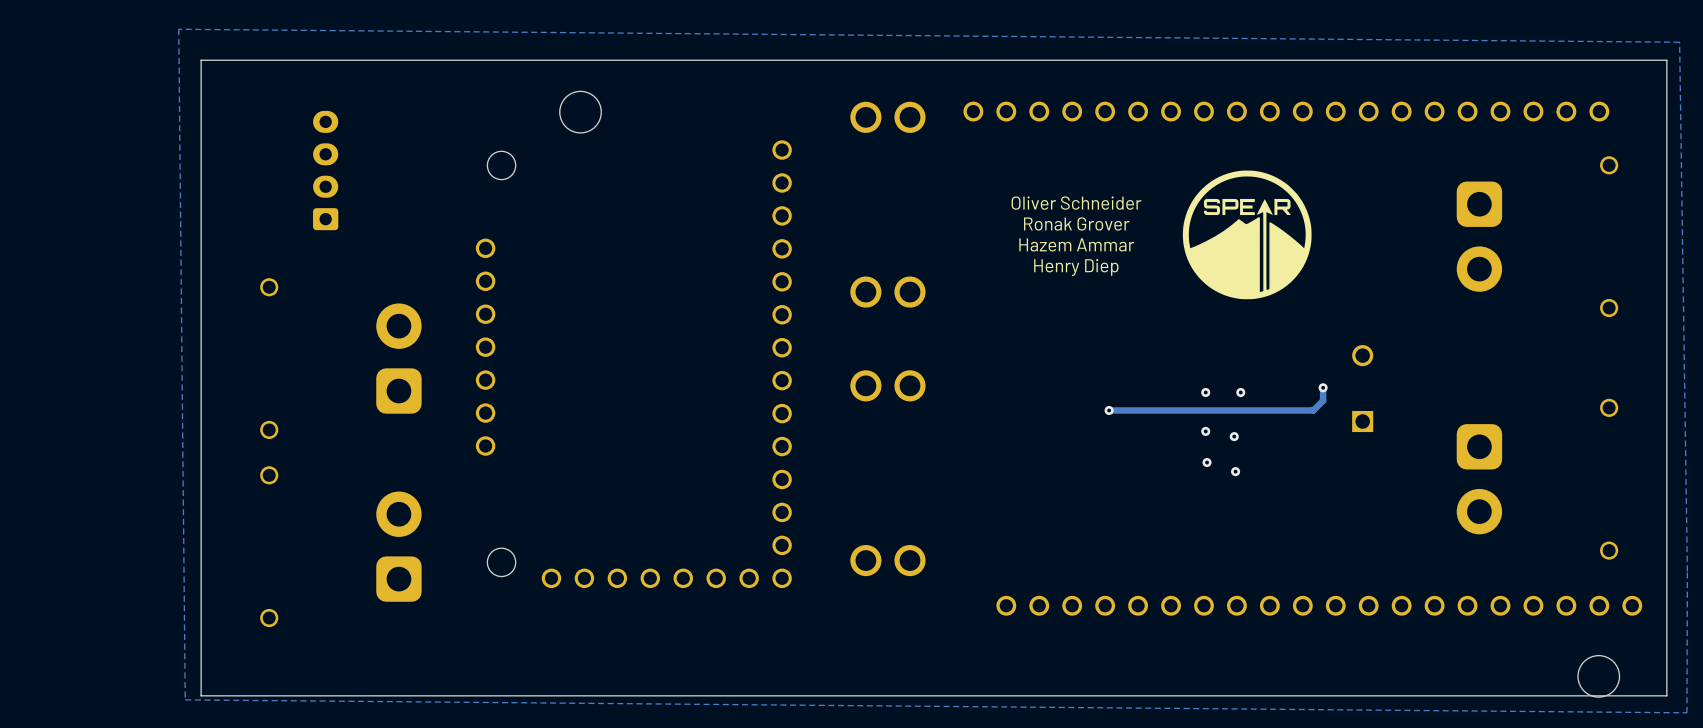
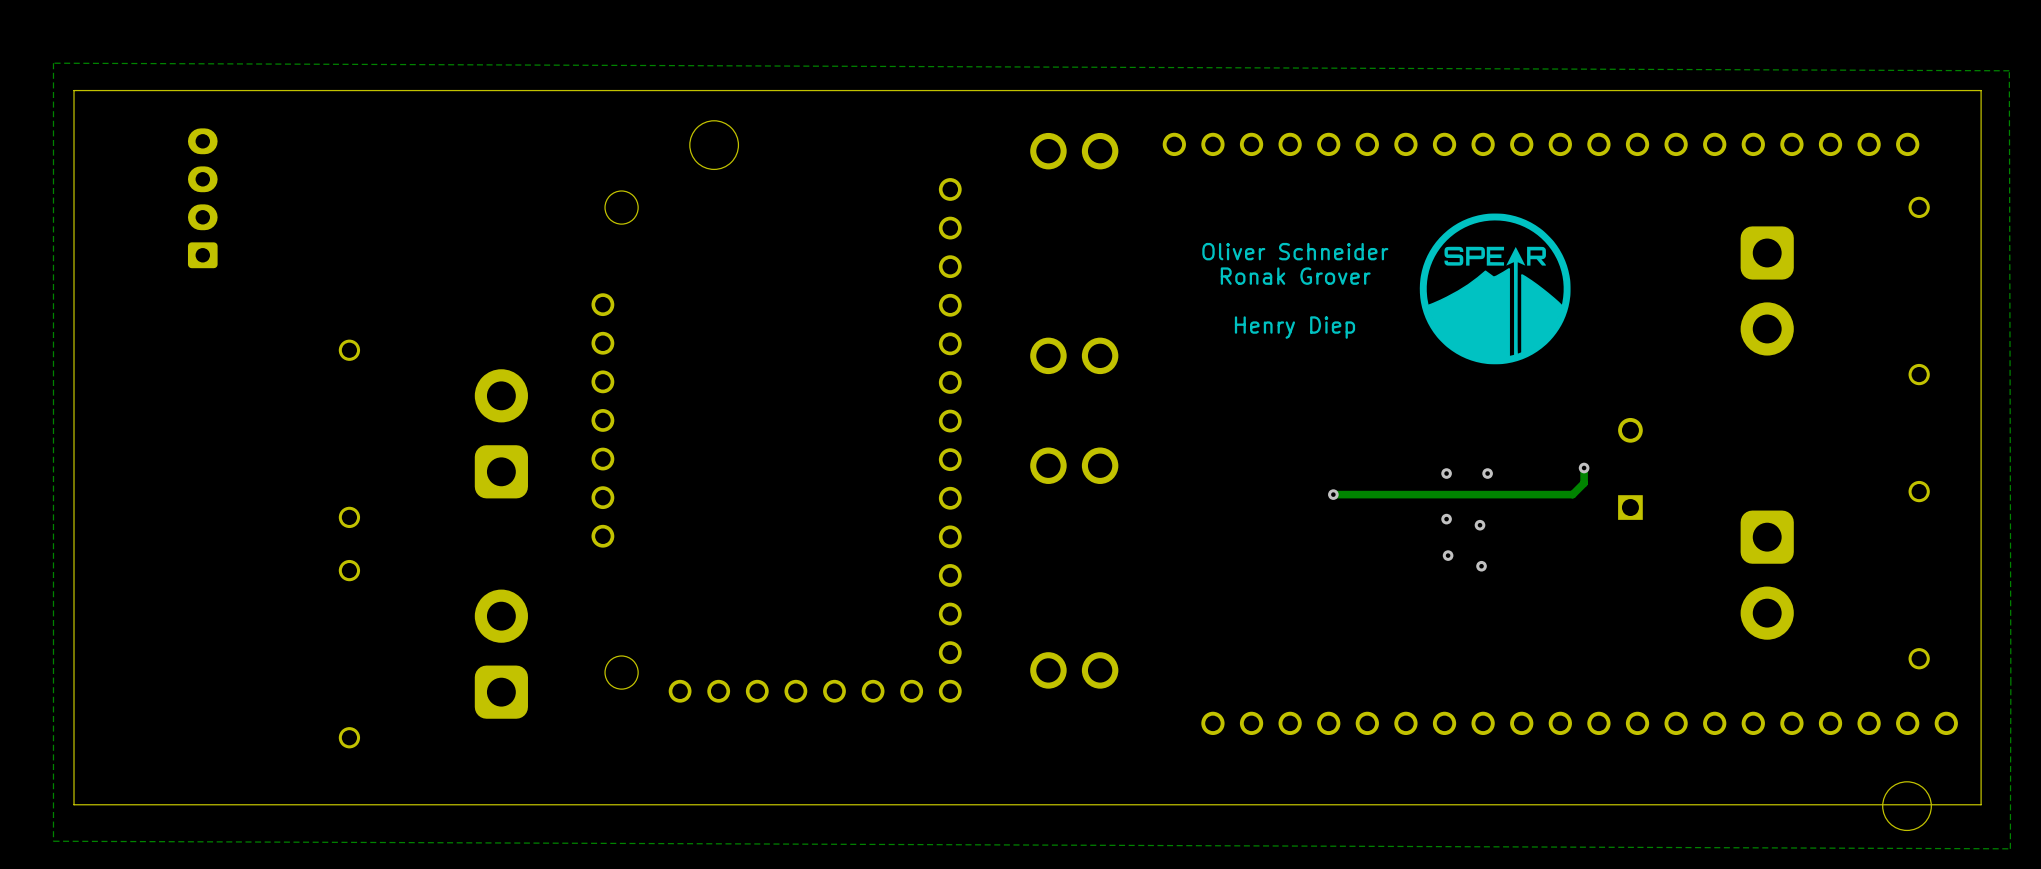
board edge: (1666, 60) (201, 60) (201, 695) (1666, 695) (1666, 60) -> (1981, 90) (1981, 804) (74, 804) (74, 90) (1981, 90)
part position: (325, 170) -> (202, 198)
text: Hazem Ammar (1076, 244) -> none
zone outline: (1687, 571) (1679, 42) (178, 29) (185, 699) (1686, 712) -> (2010, 683) (2009, 70) (53, 63) (53, 841) (2010, 848)

